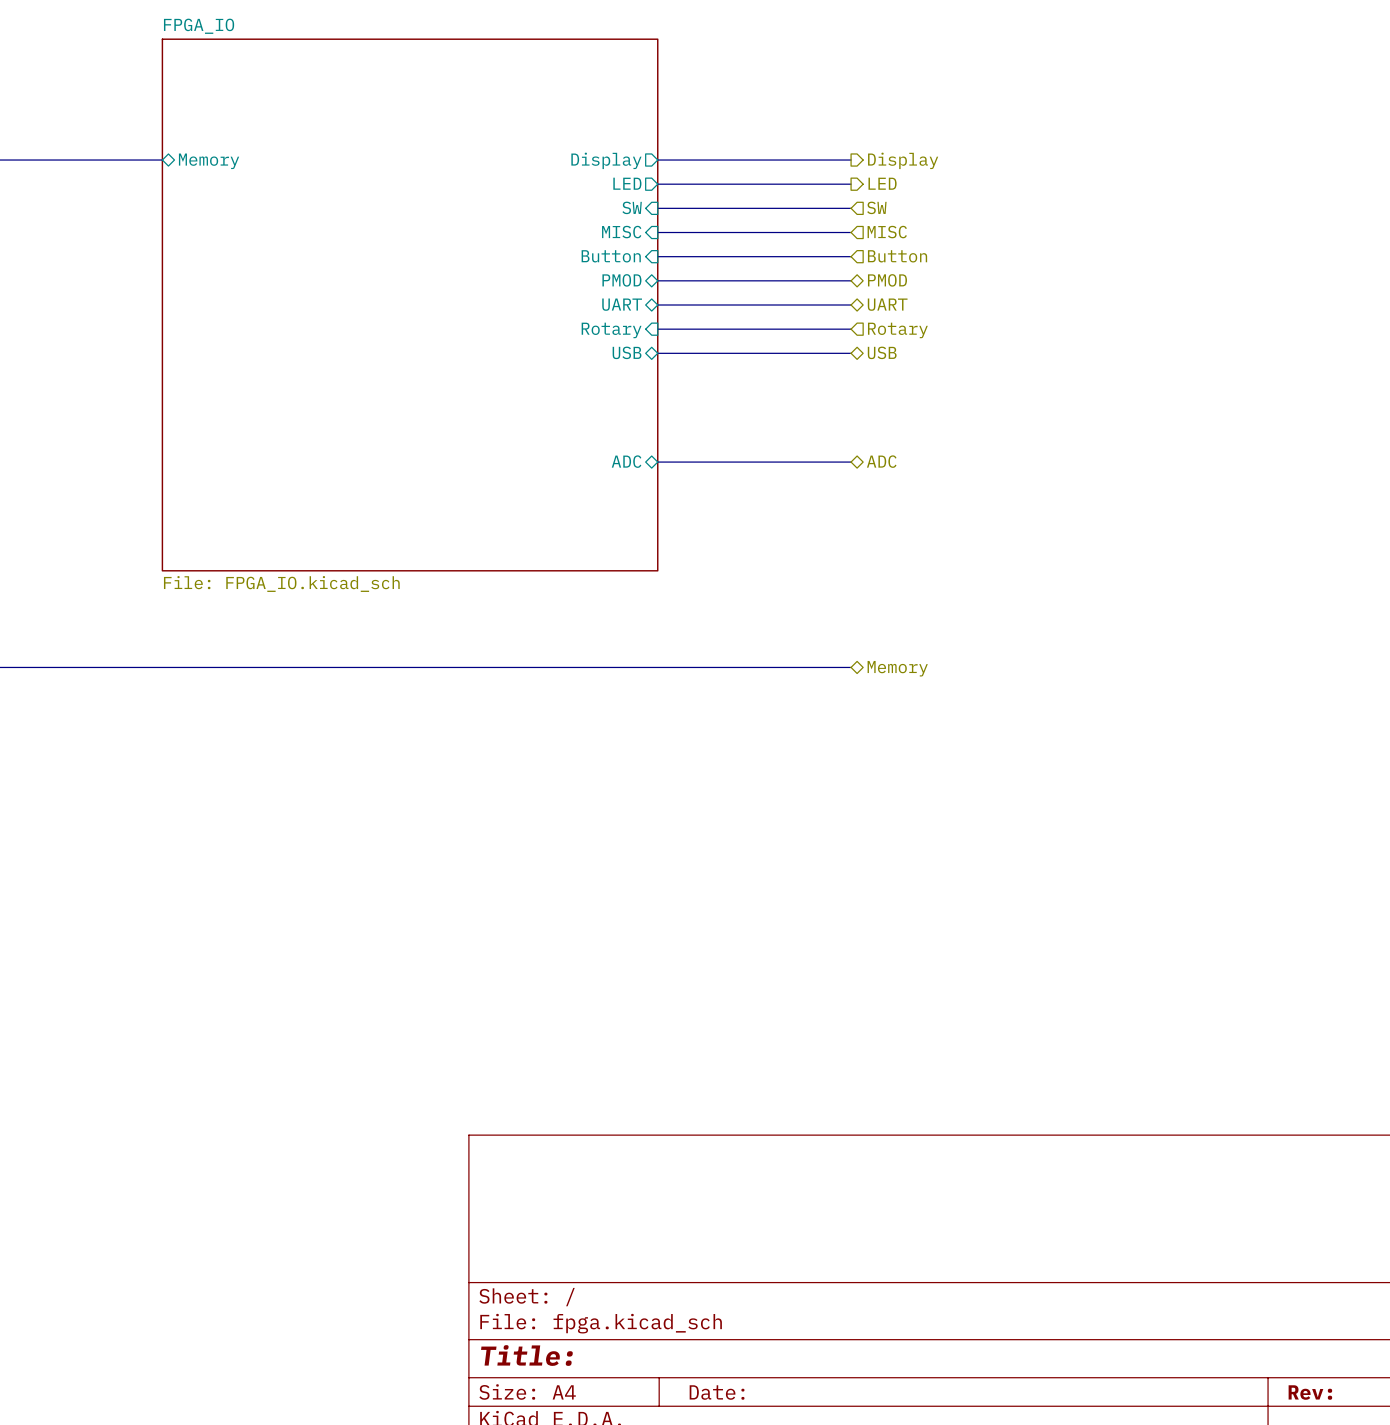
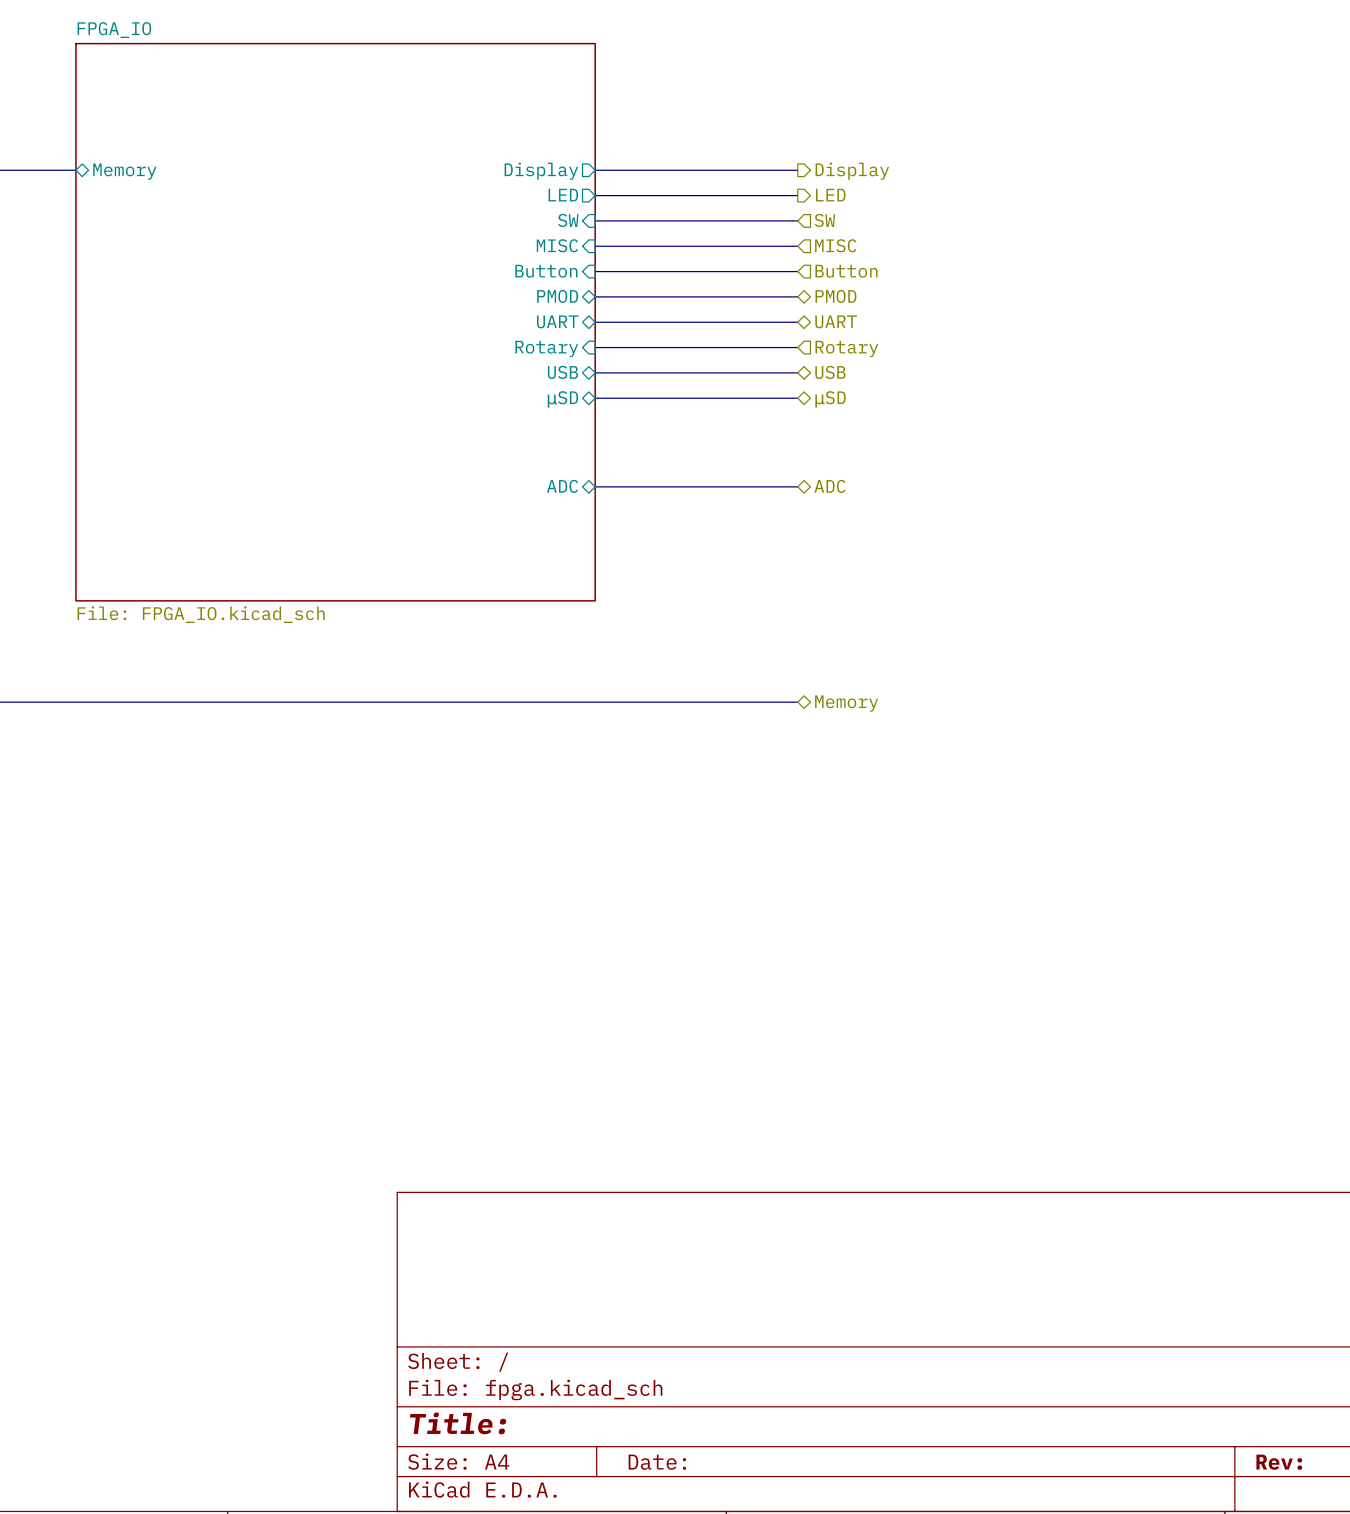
bus: none -> (595, 398) (797, 398)
sheet pin: none -> μSD (562, 399)
hierarchical label: none -> μSD (830, 399)

